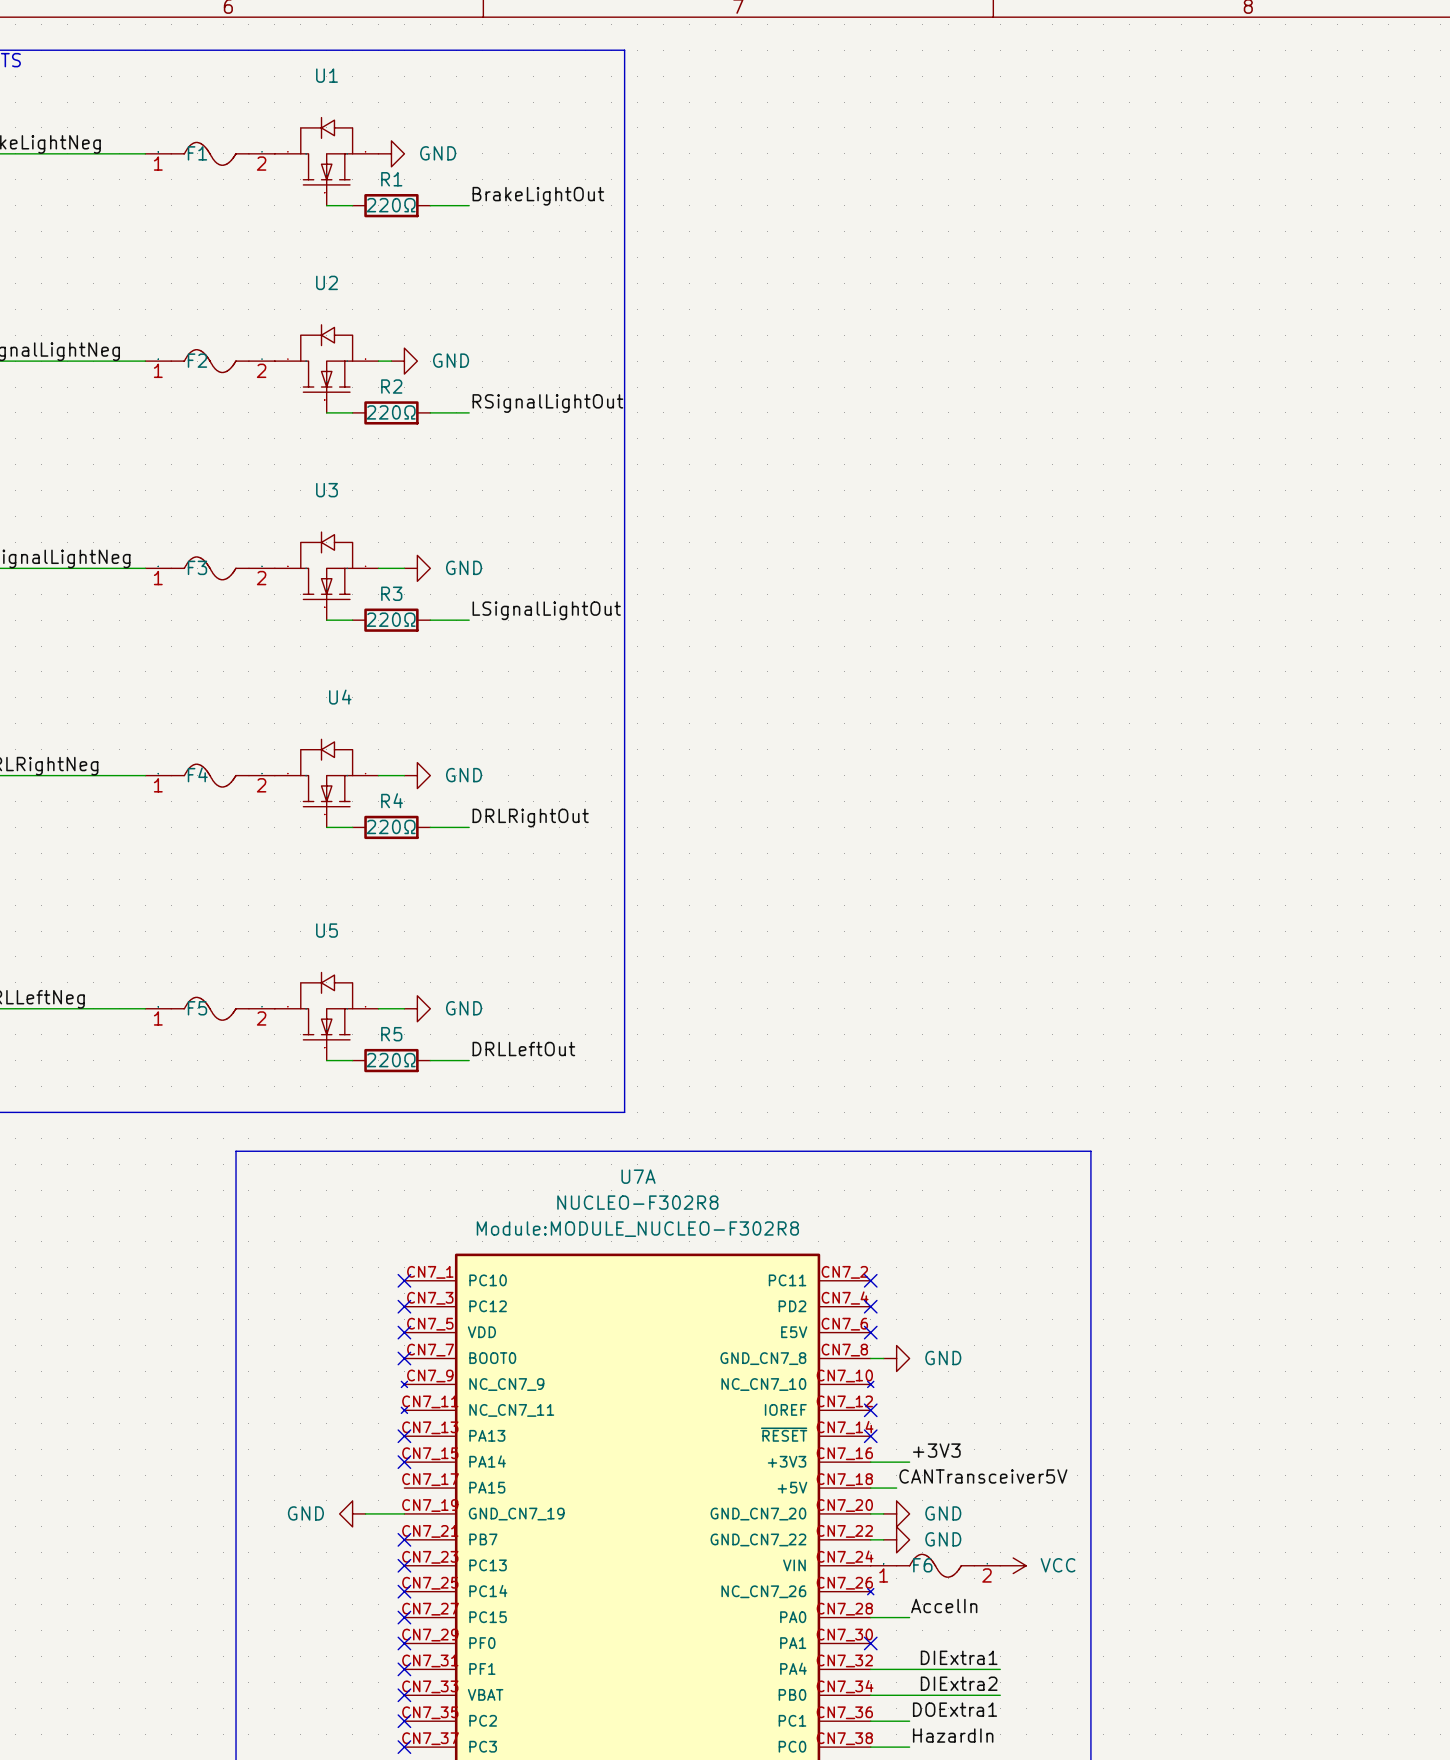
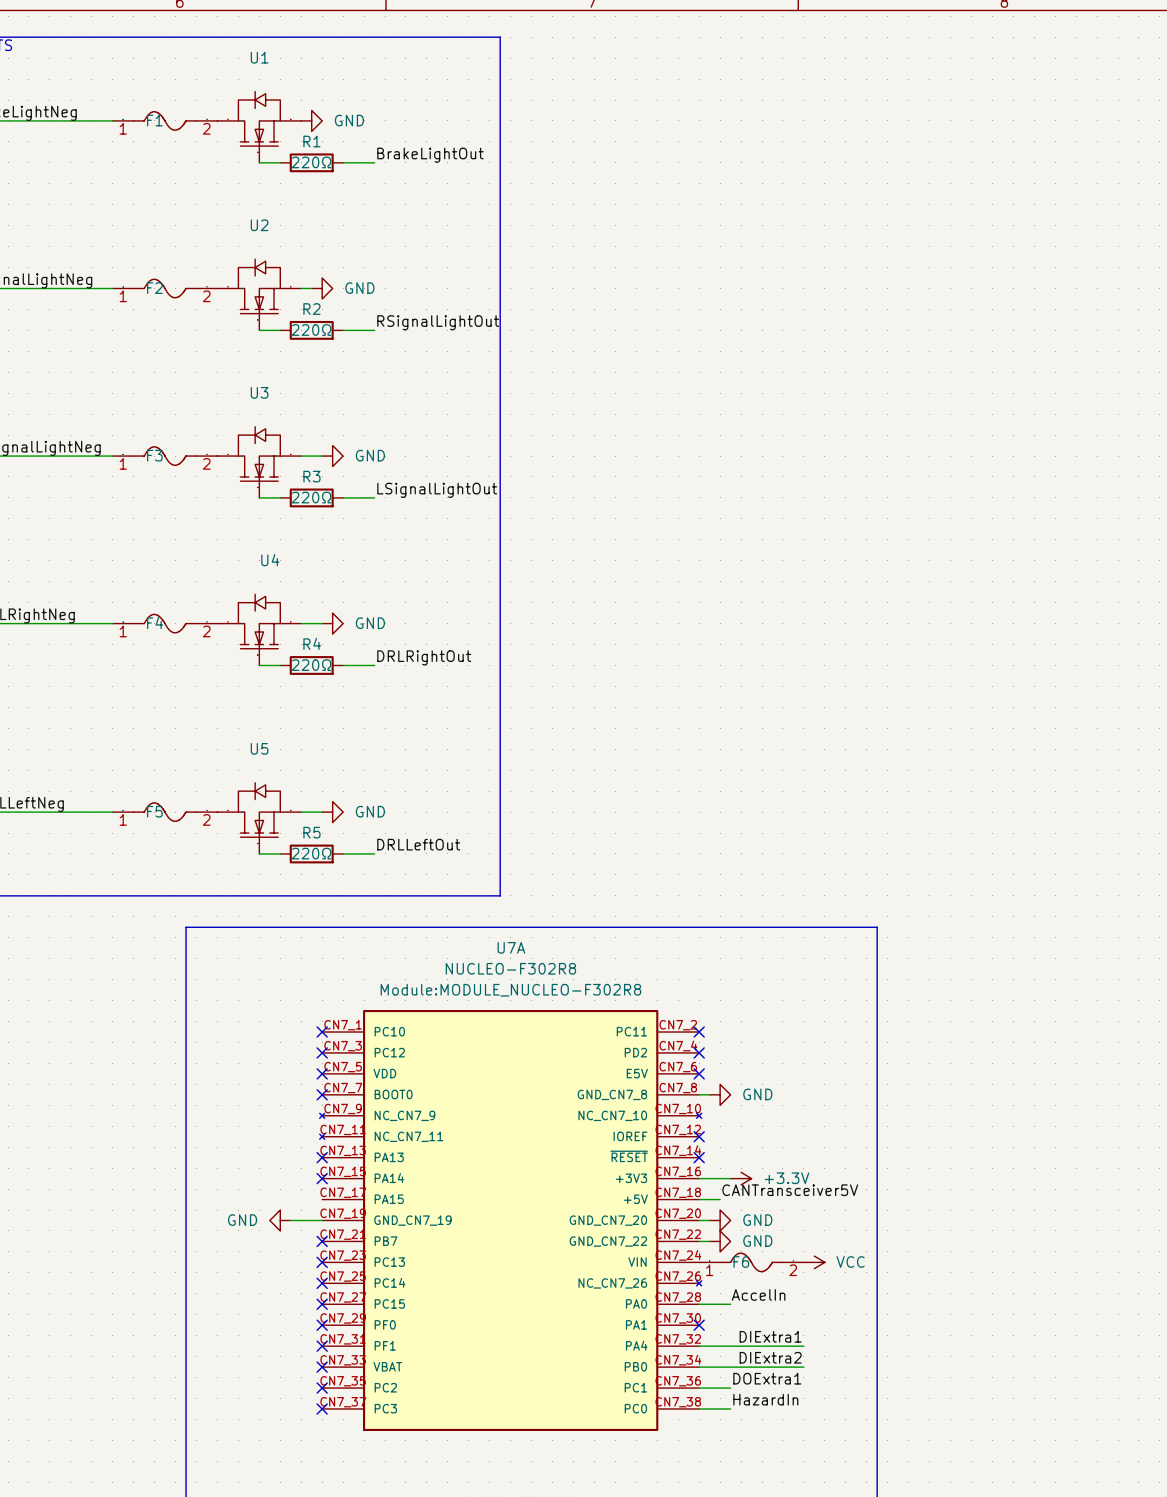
label: +3V3 (936, 1450) -> none
power symbol: none -> +3.3V (741, 1178)

